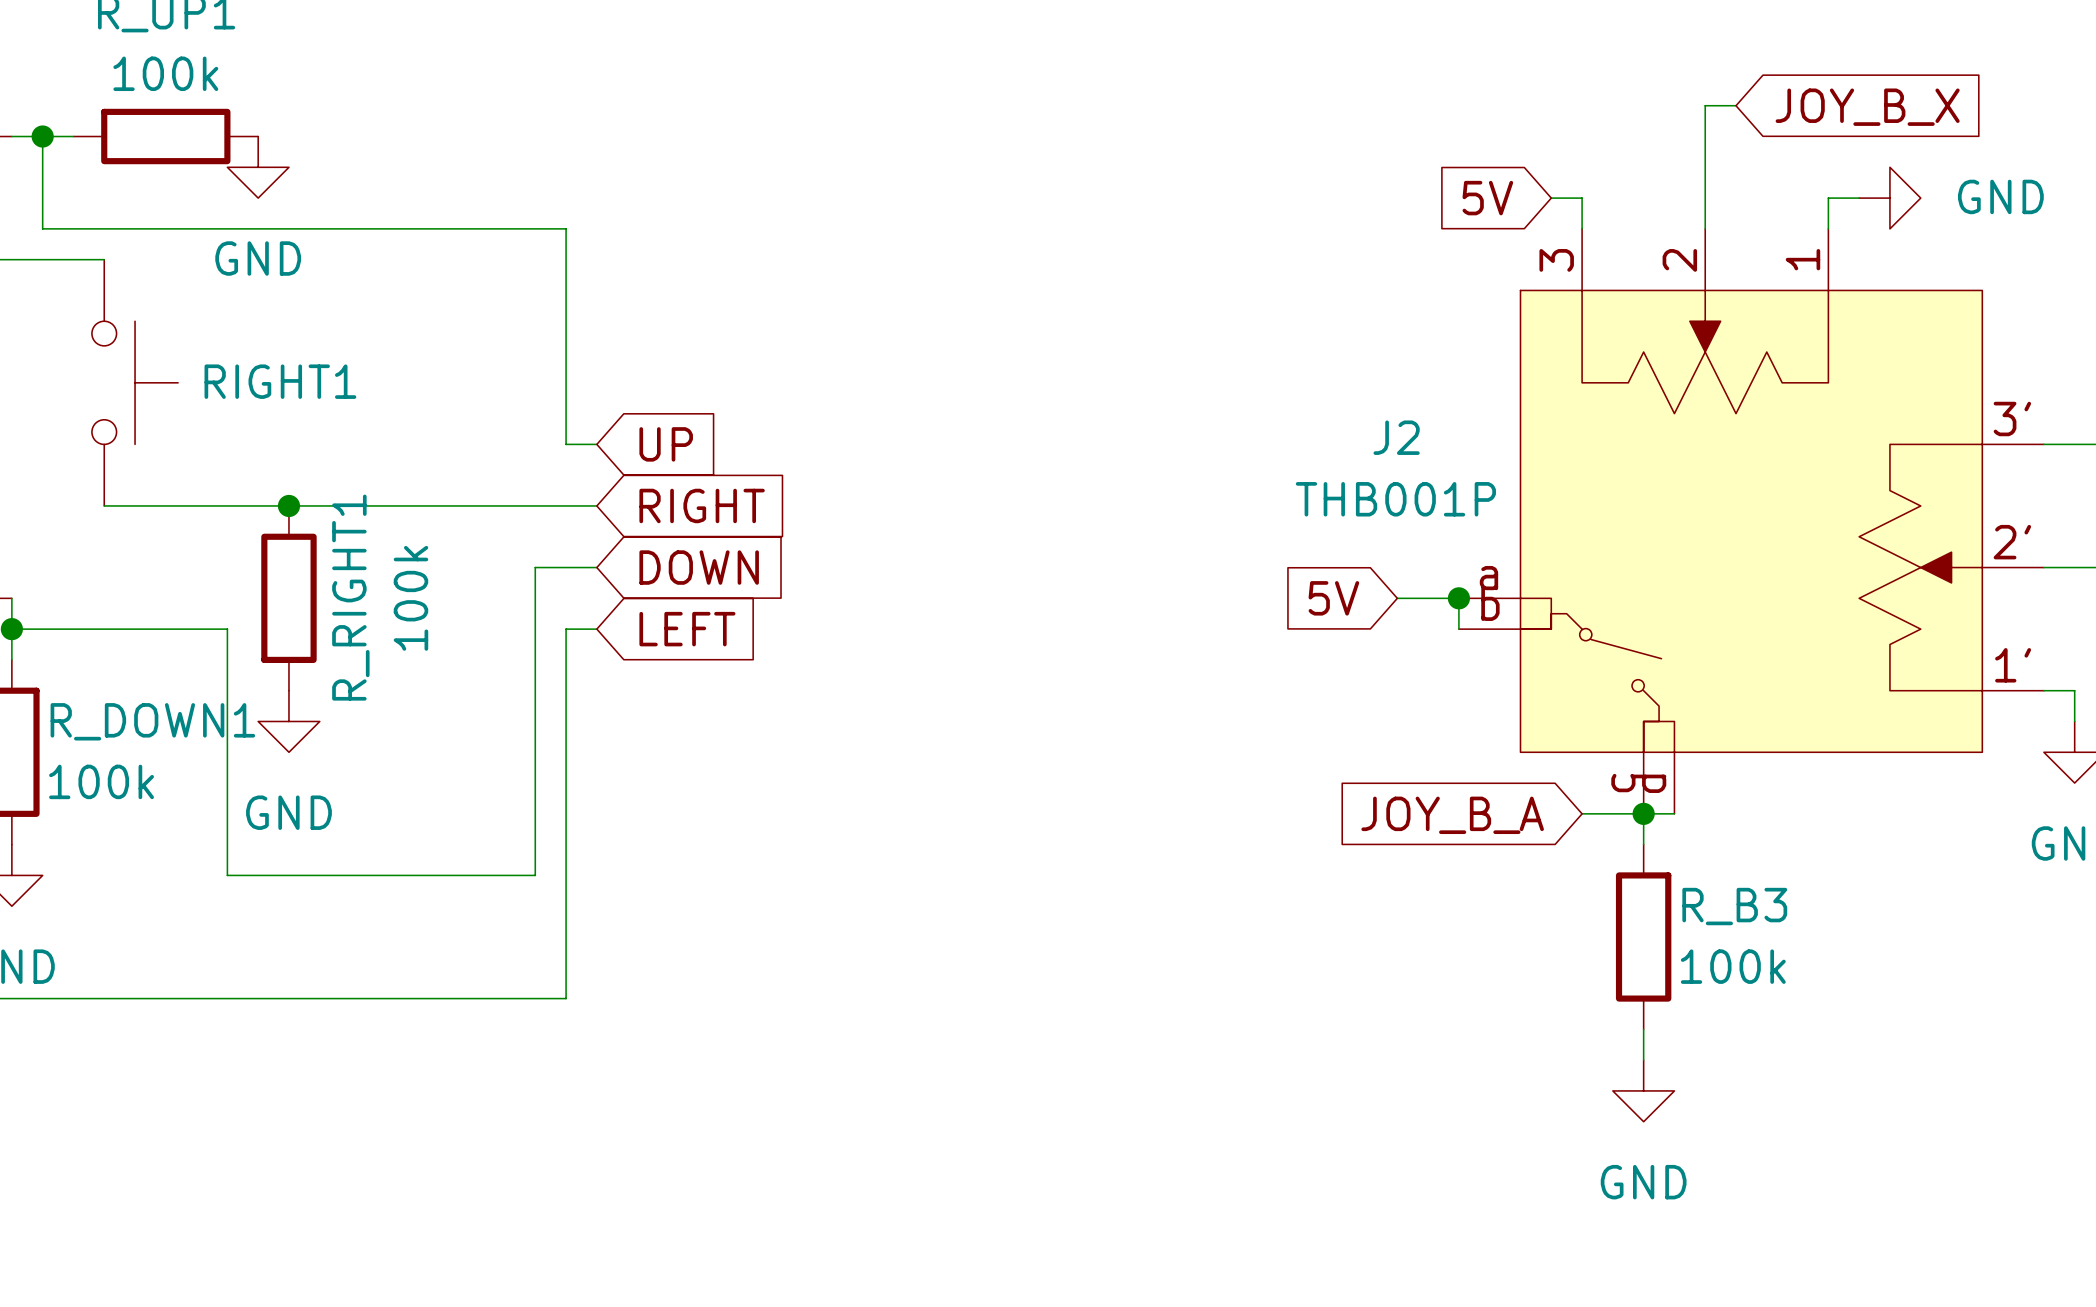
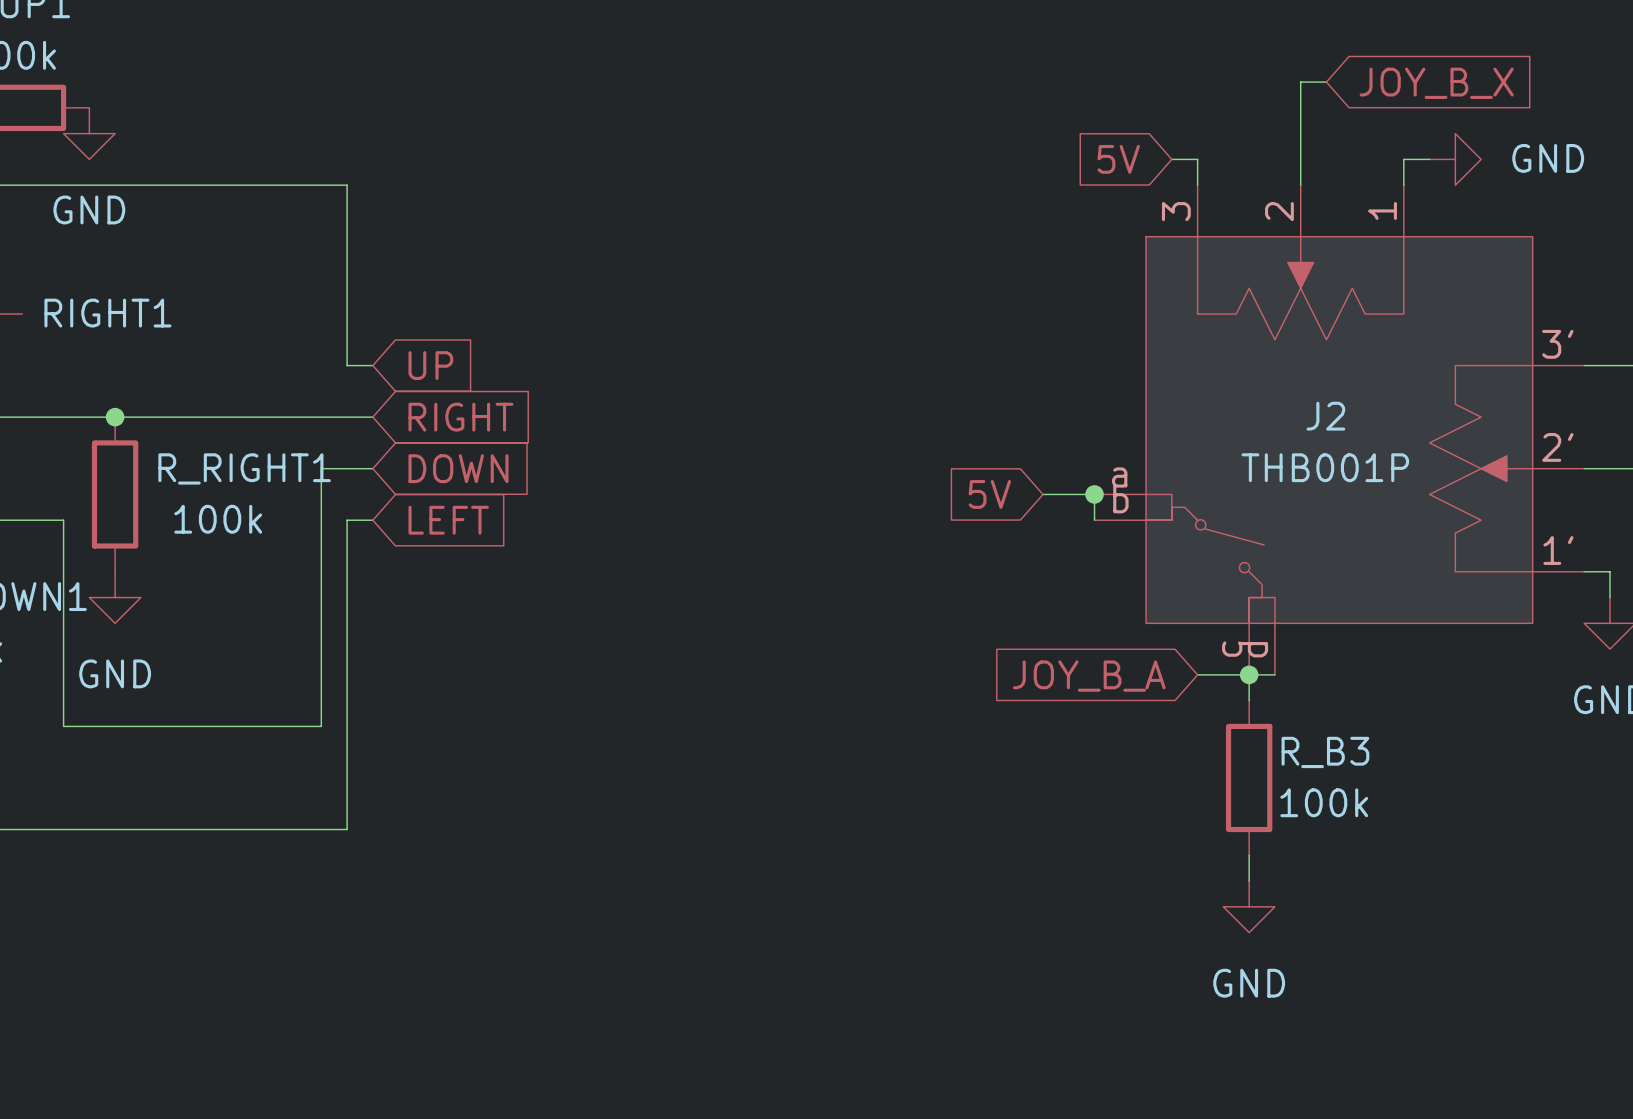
J2 name position: J2 (1396, 437) -> J2 (1325, 416)
J2 value position: THB001P (1395, 499) -> THB001P (1325, 467)
R_RIGHT1 name rotation: 0° (350, 597) -> 90° clockwise (244, 468)
R_RIGHT1 value rotation: 0° (410, 598) -> 90° clockwise (218, 519)

